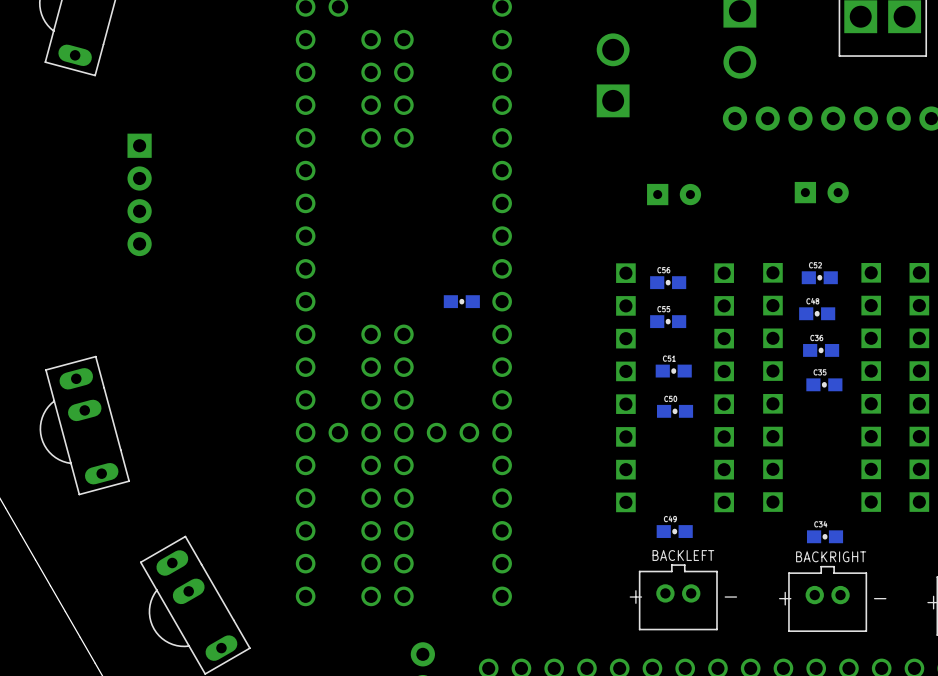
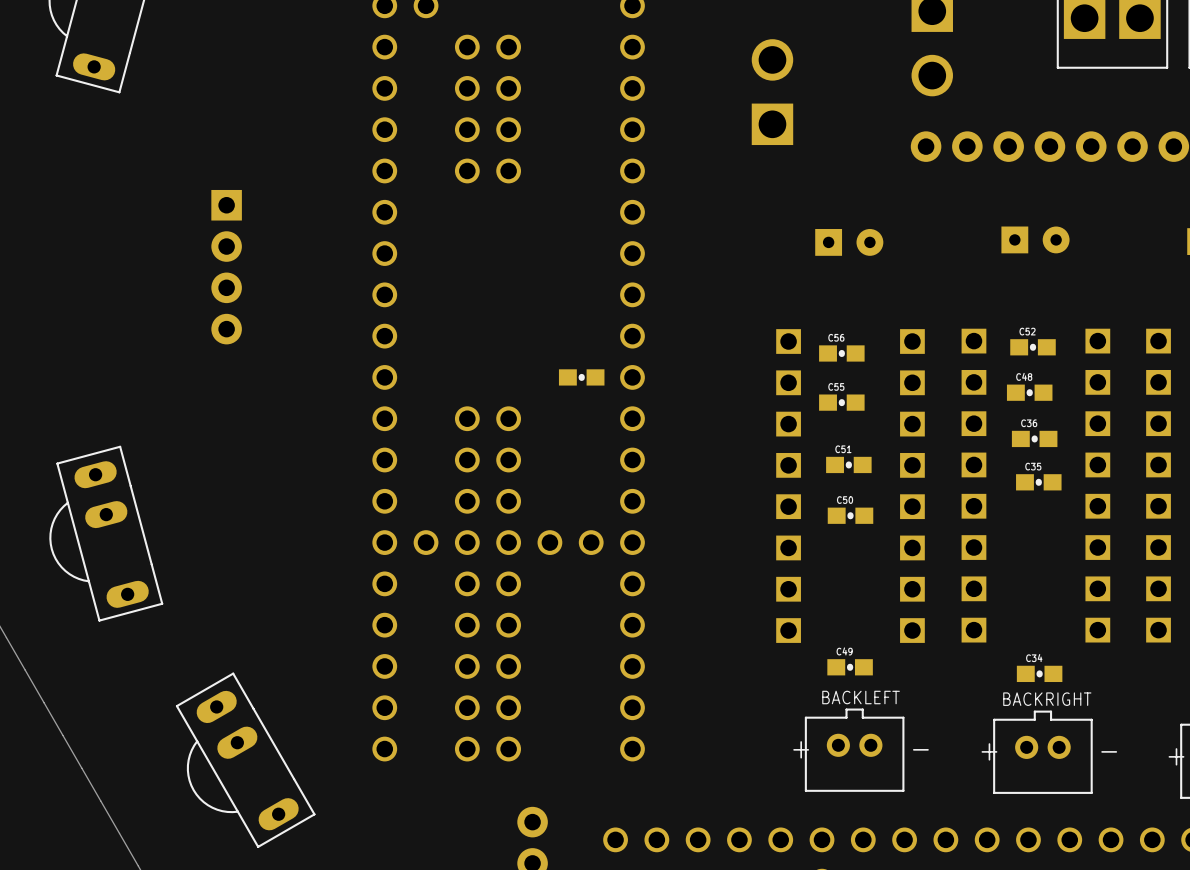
part position: (139, 194) -> (226, 267)

